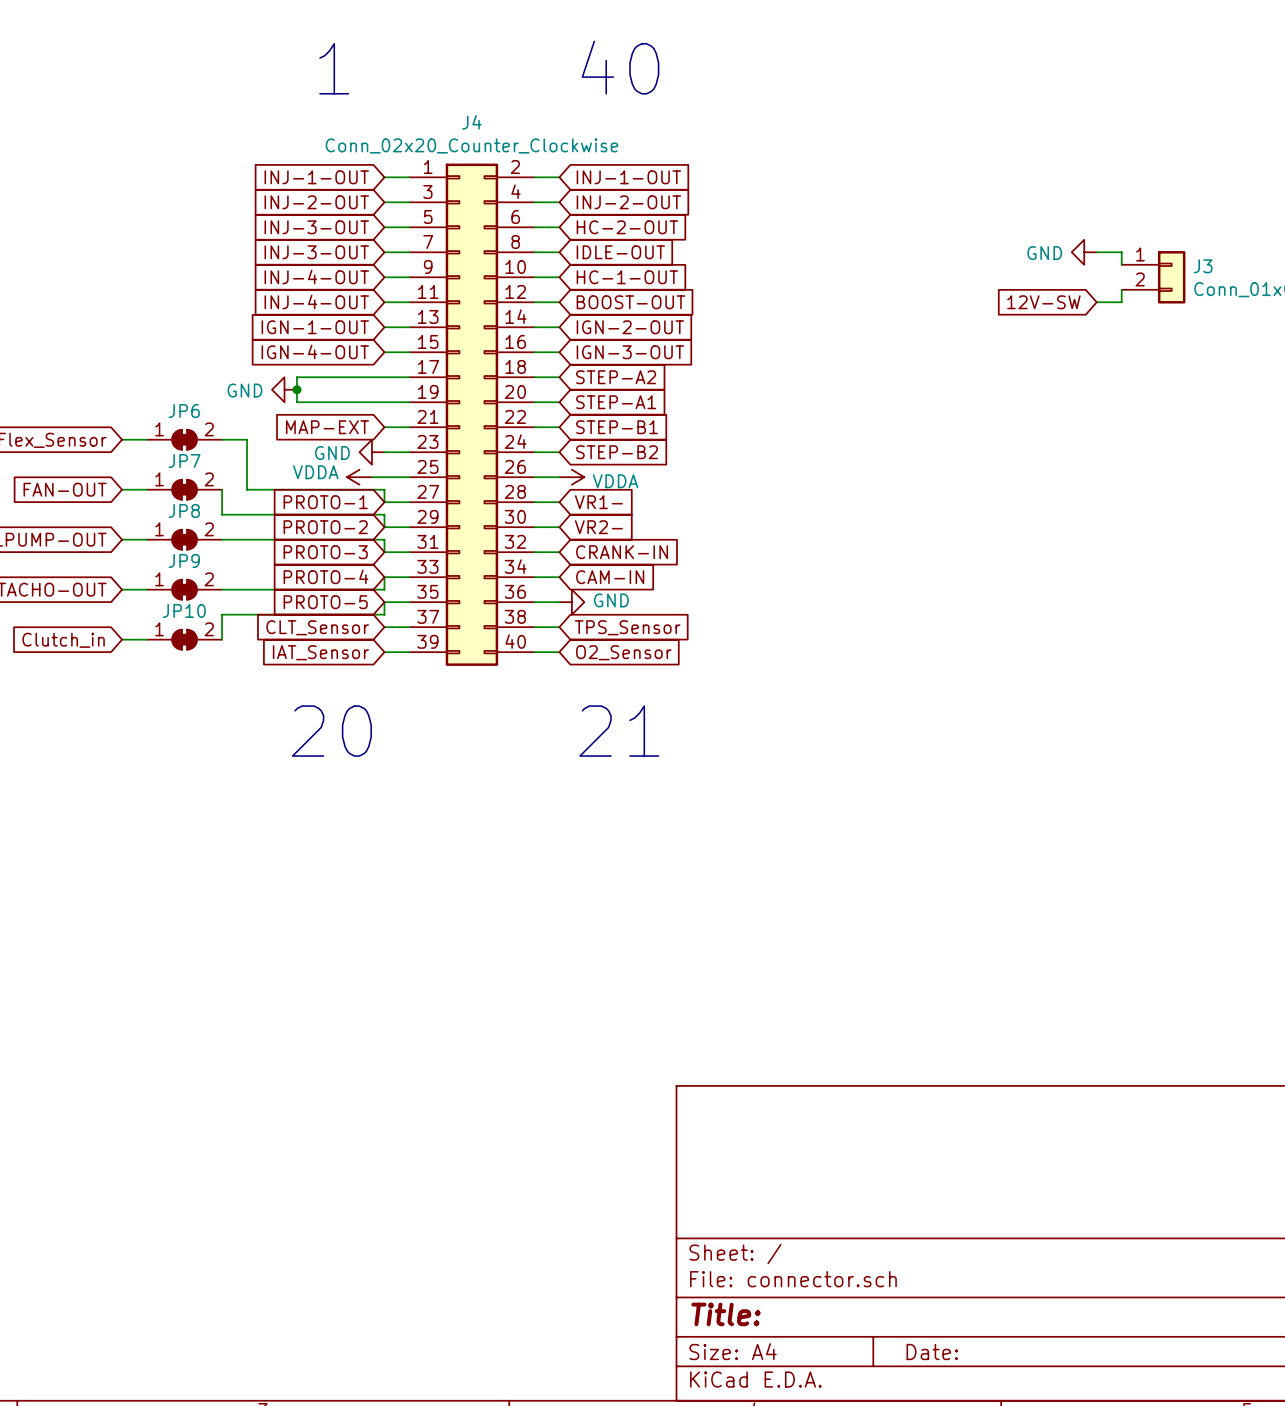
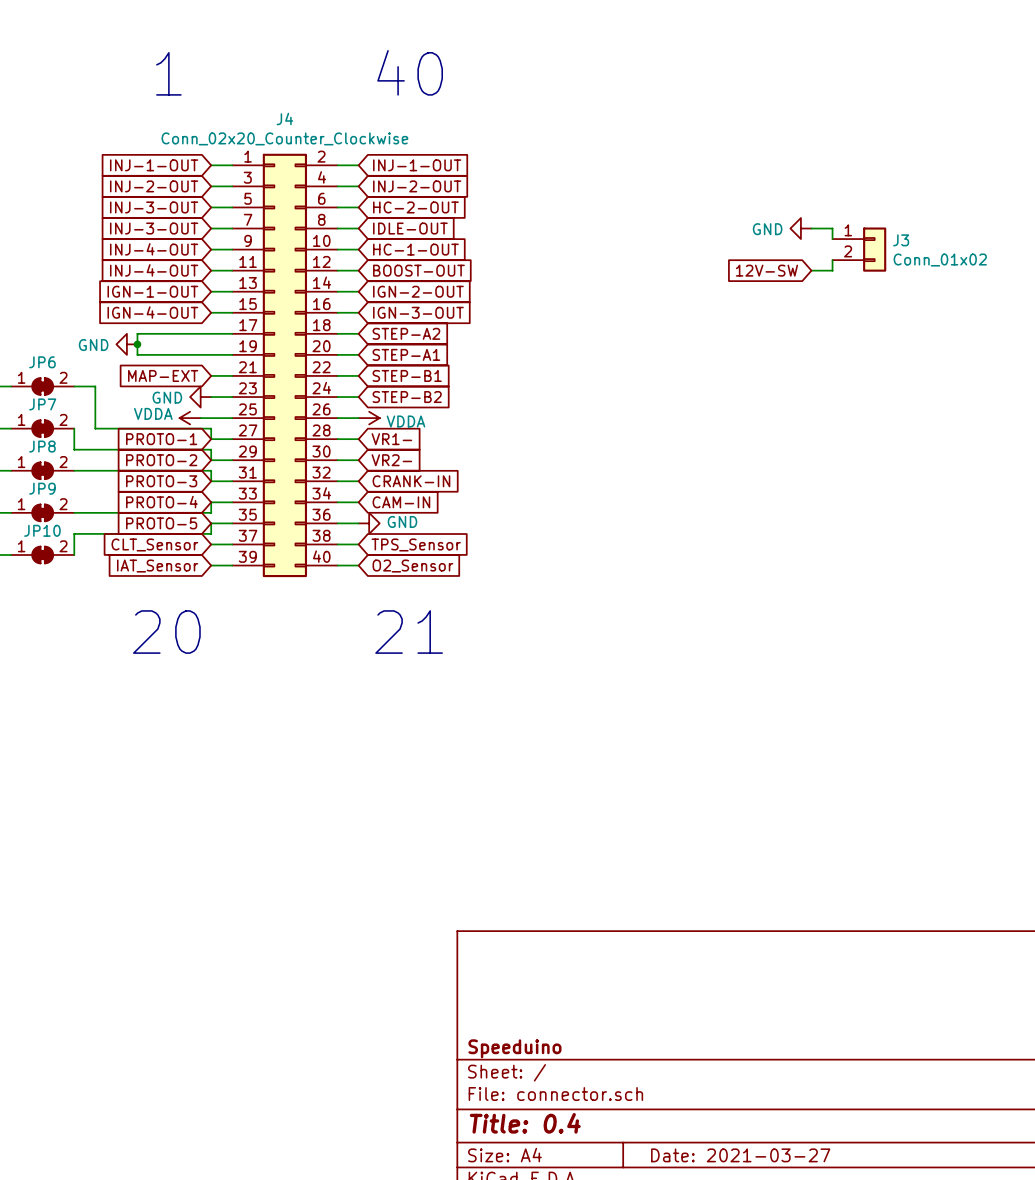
title block: none -> Speeduino (514, 1048)
title block: Title: (726, 1314) -> Title: 0.4 (525, 1123)
title block: Date: (932, 1352) -> Date: 2021-03-27 (740, 1155)

